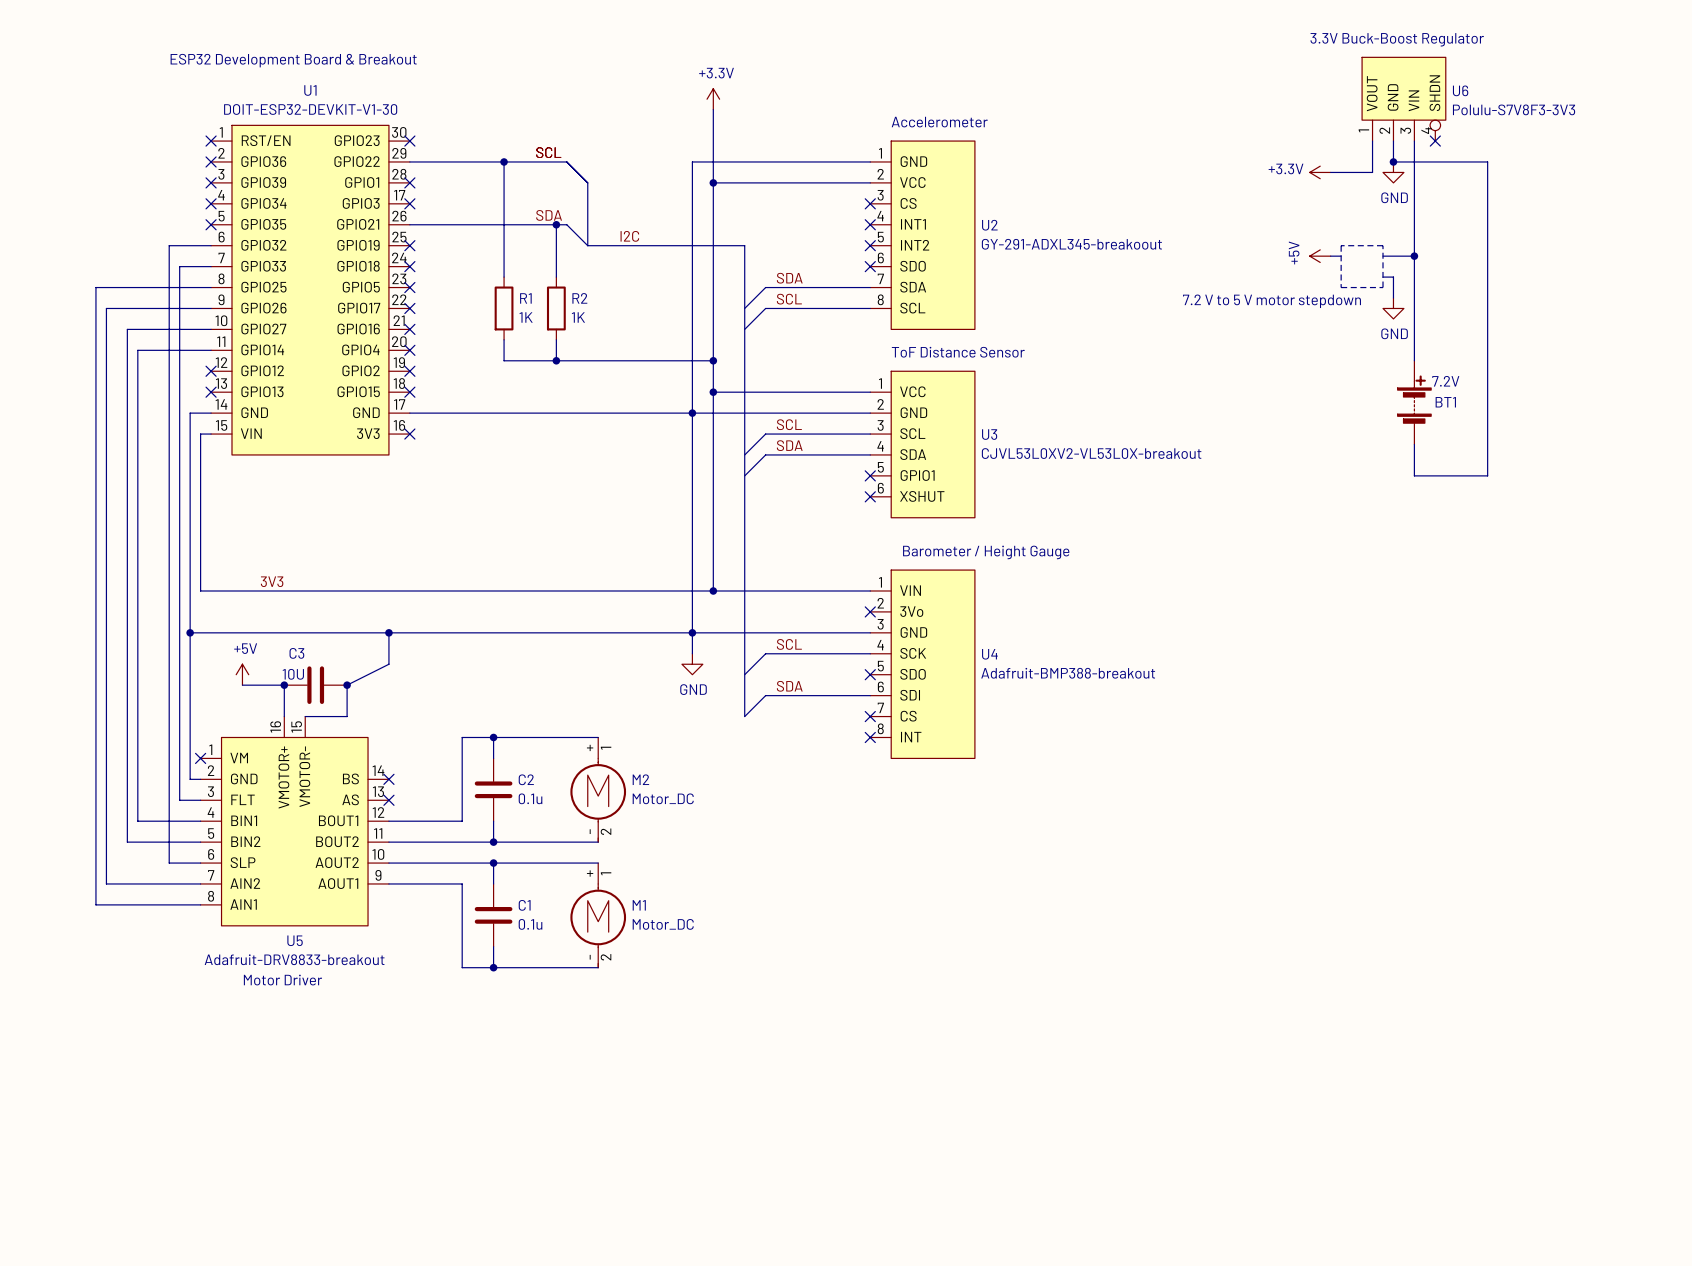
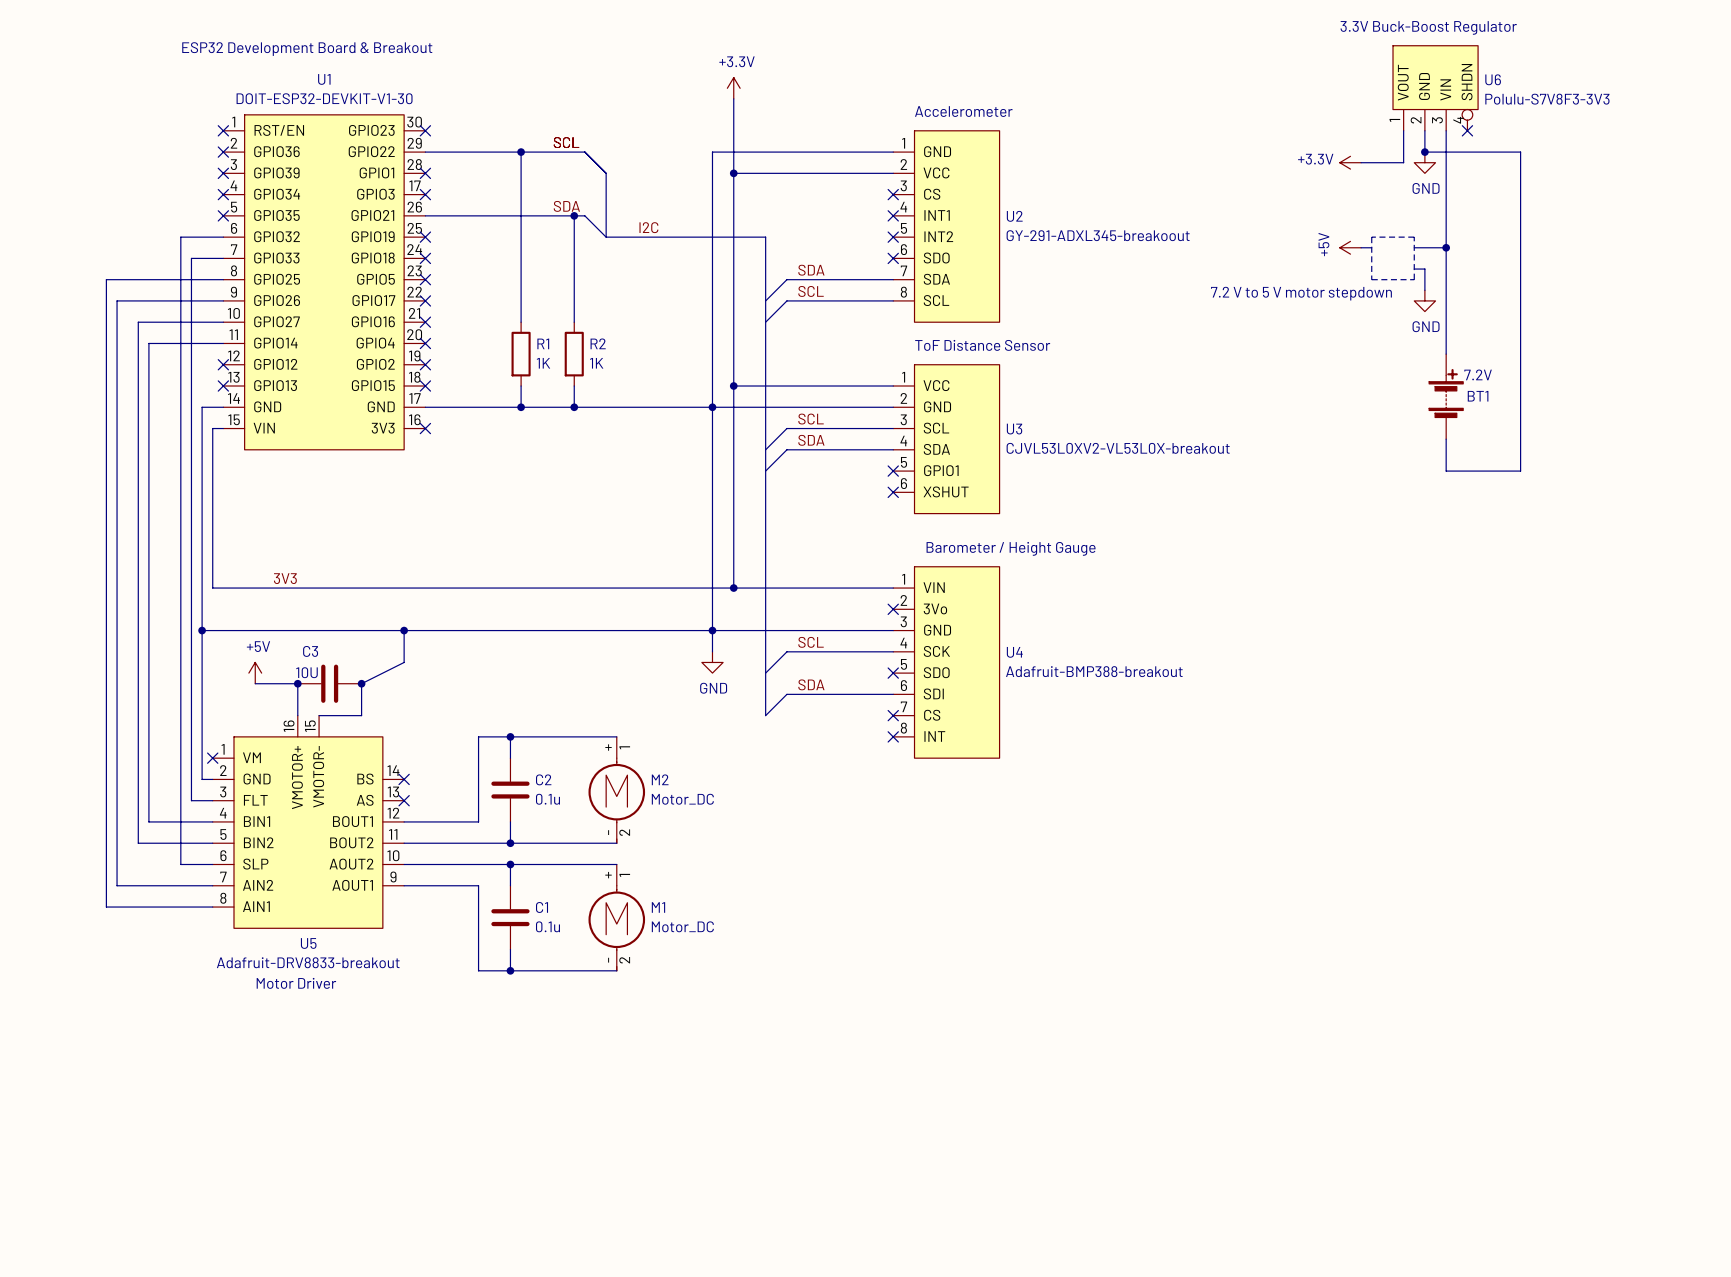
wire: none -> (521, 269) (521, 322)
wire: none -> (574, 269) (574, 322)
R1 position: (504, 308) -> (521, 354)
R2 position: (556, 308) -> (574, 354)
wire: (504, 339) (504, 360) (713, 360) -> none
wire: (556, 339) (556, 360) -> (574, 386) (574, 407)
junction: (556, 360) -> none
junction: (713, 360) -> none
wire: none -> (521, 386) (521, 407)
junction: none -> (521, 407)
junction: none -> (574, 407)

